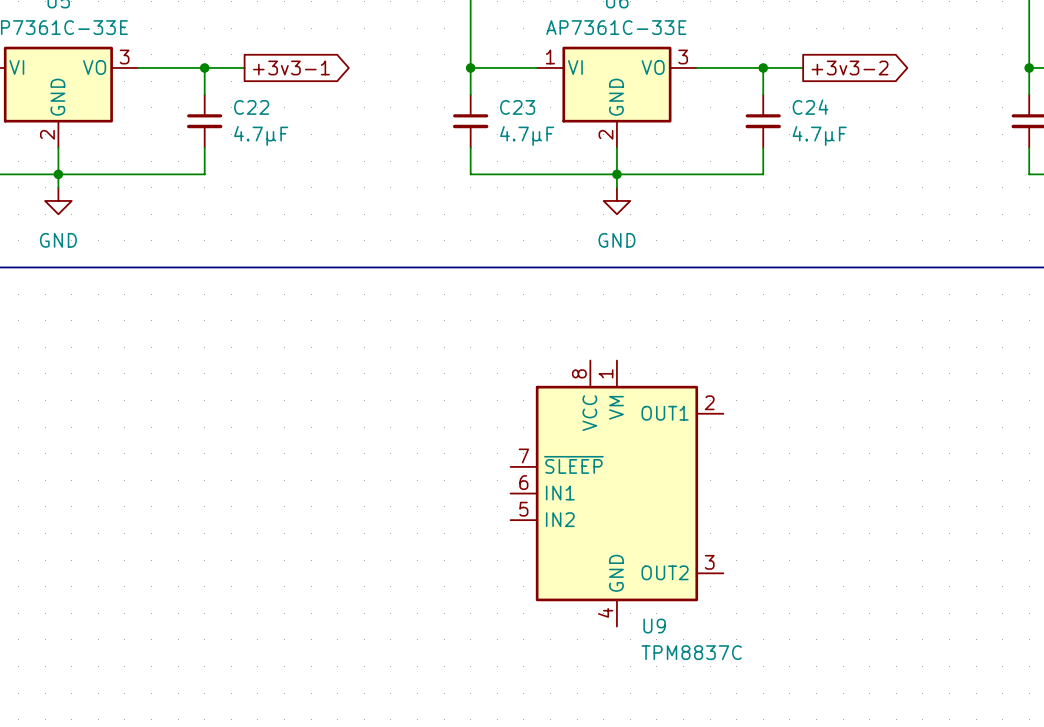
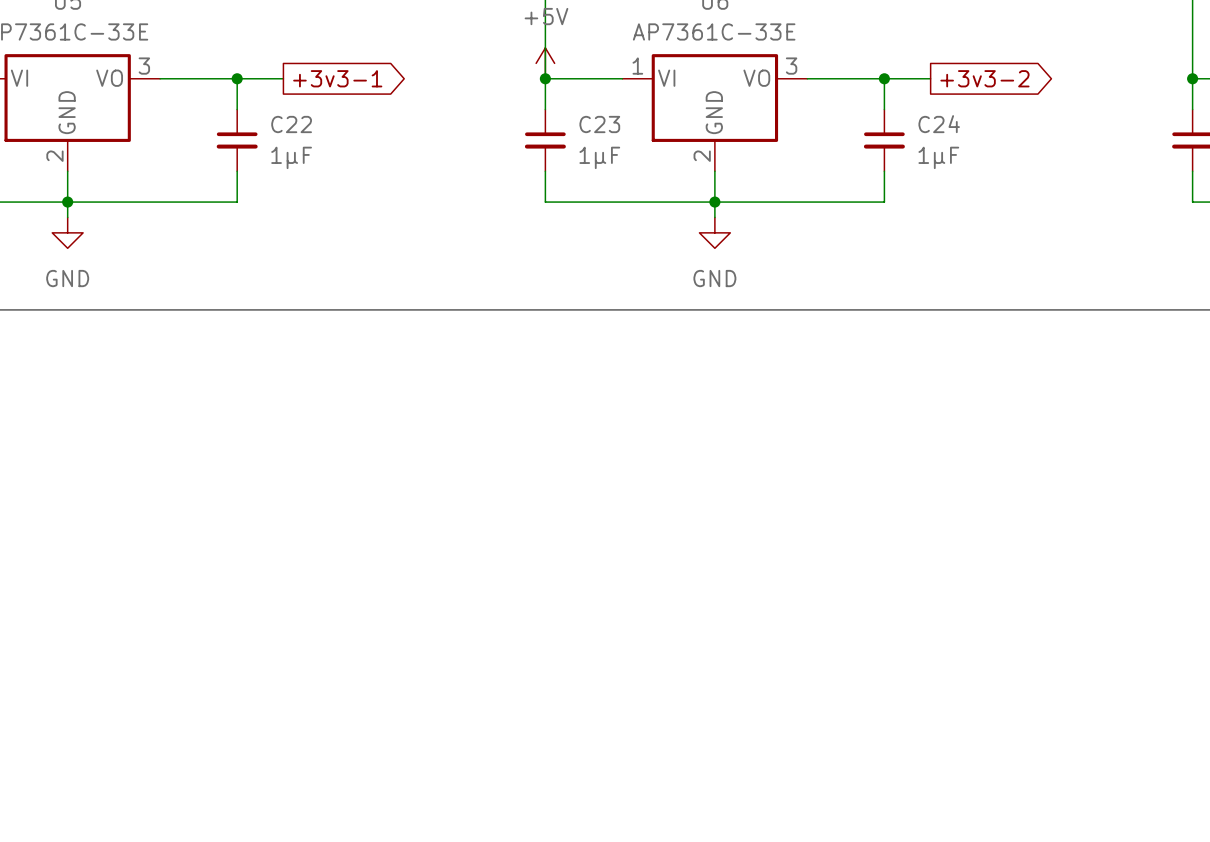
power symbol: none -> +5V (545, 63)
C22 value: 4.7μF (261, 135) -> 1μF (291, 157)
C23 value: 4.7μF (527, 135) -> 1μF (599, 157)
C24 value: 4.7μF (819, 135) -> 1μF (938, 157)
U9: TPM8837C (616, 493) -> none

